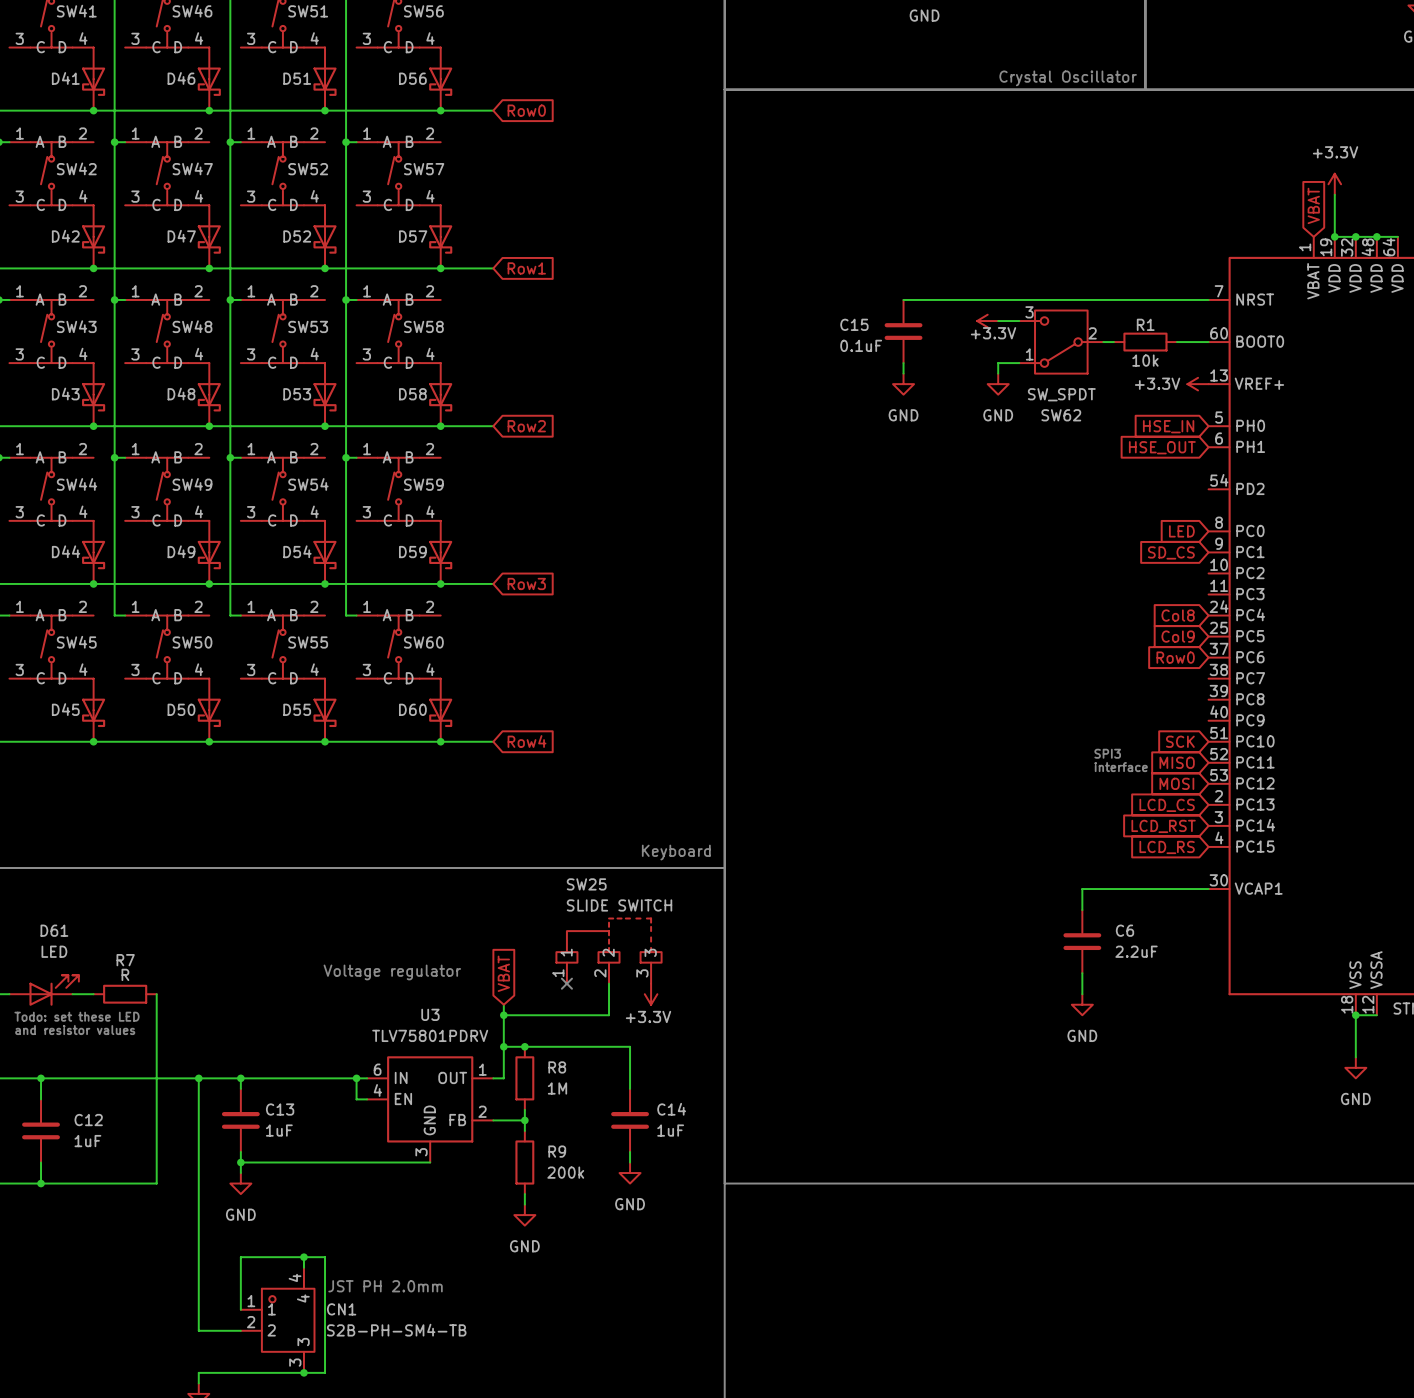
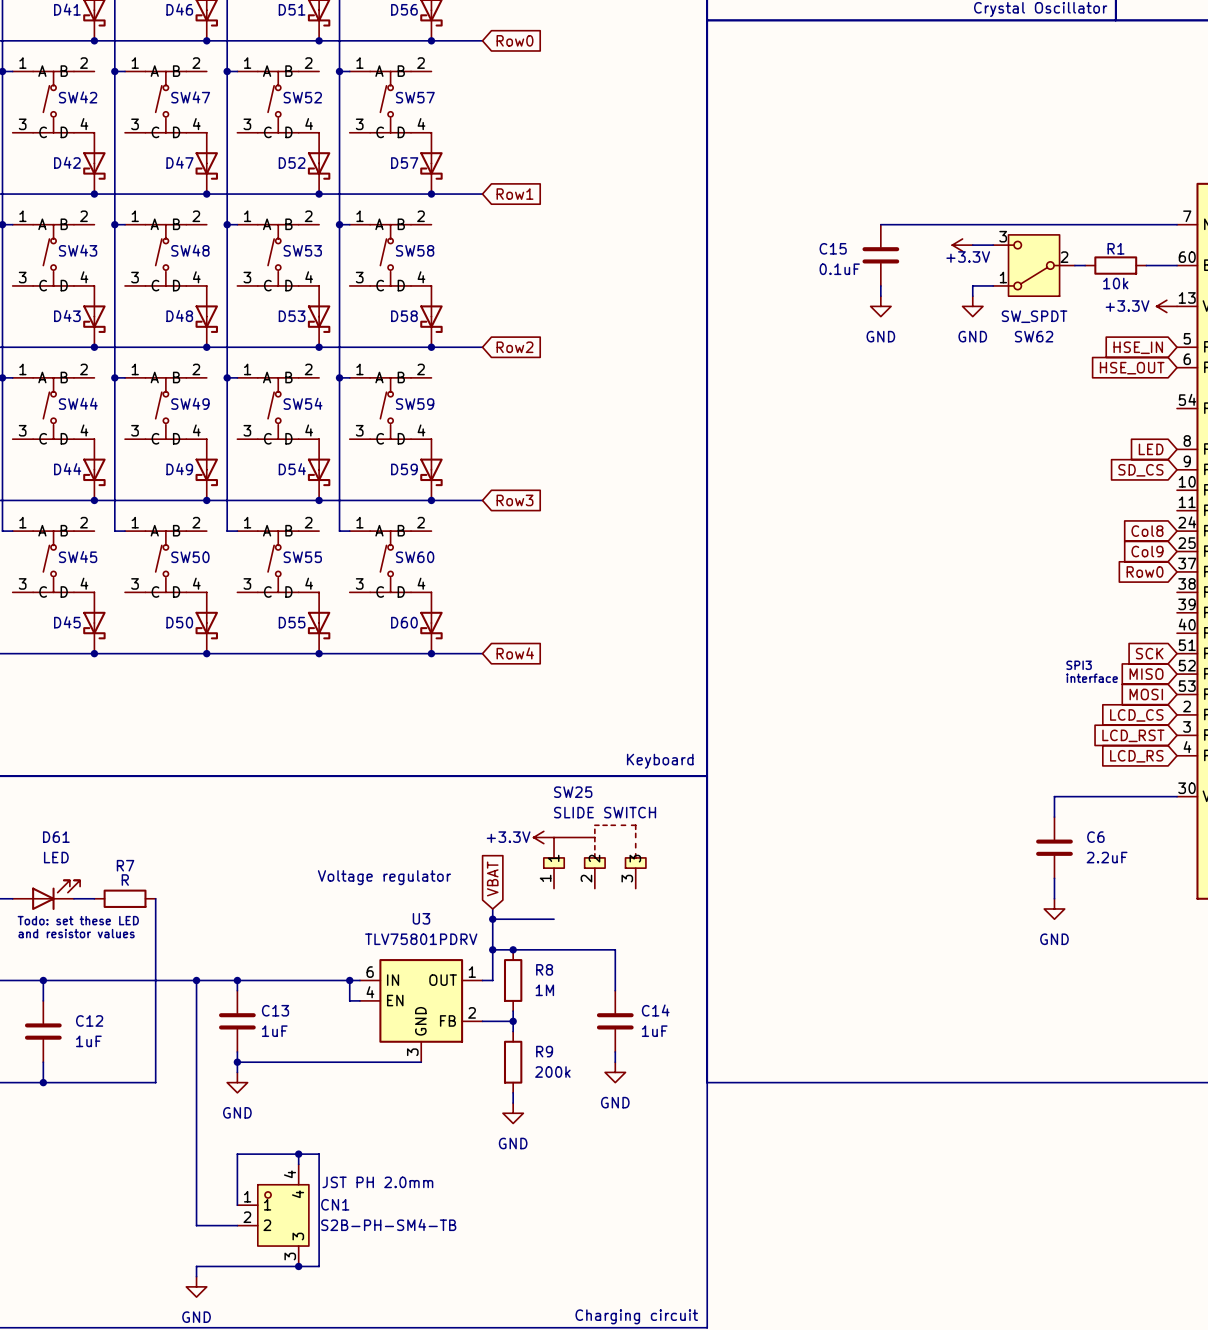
no-connect mark: (566, 983) -> none
wire: (609, 983) (609, 1015) (566, 1015) -> none
power symbol rotation: 0° (651, 994) -> 90° clockwise (543, 837)
power symbol position: +3.3V (651, 994) -> +3.3V (543, 837)
power symbol text position: +3.3V (648, 1016) -> +3.3V (508, 837)

